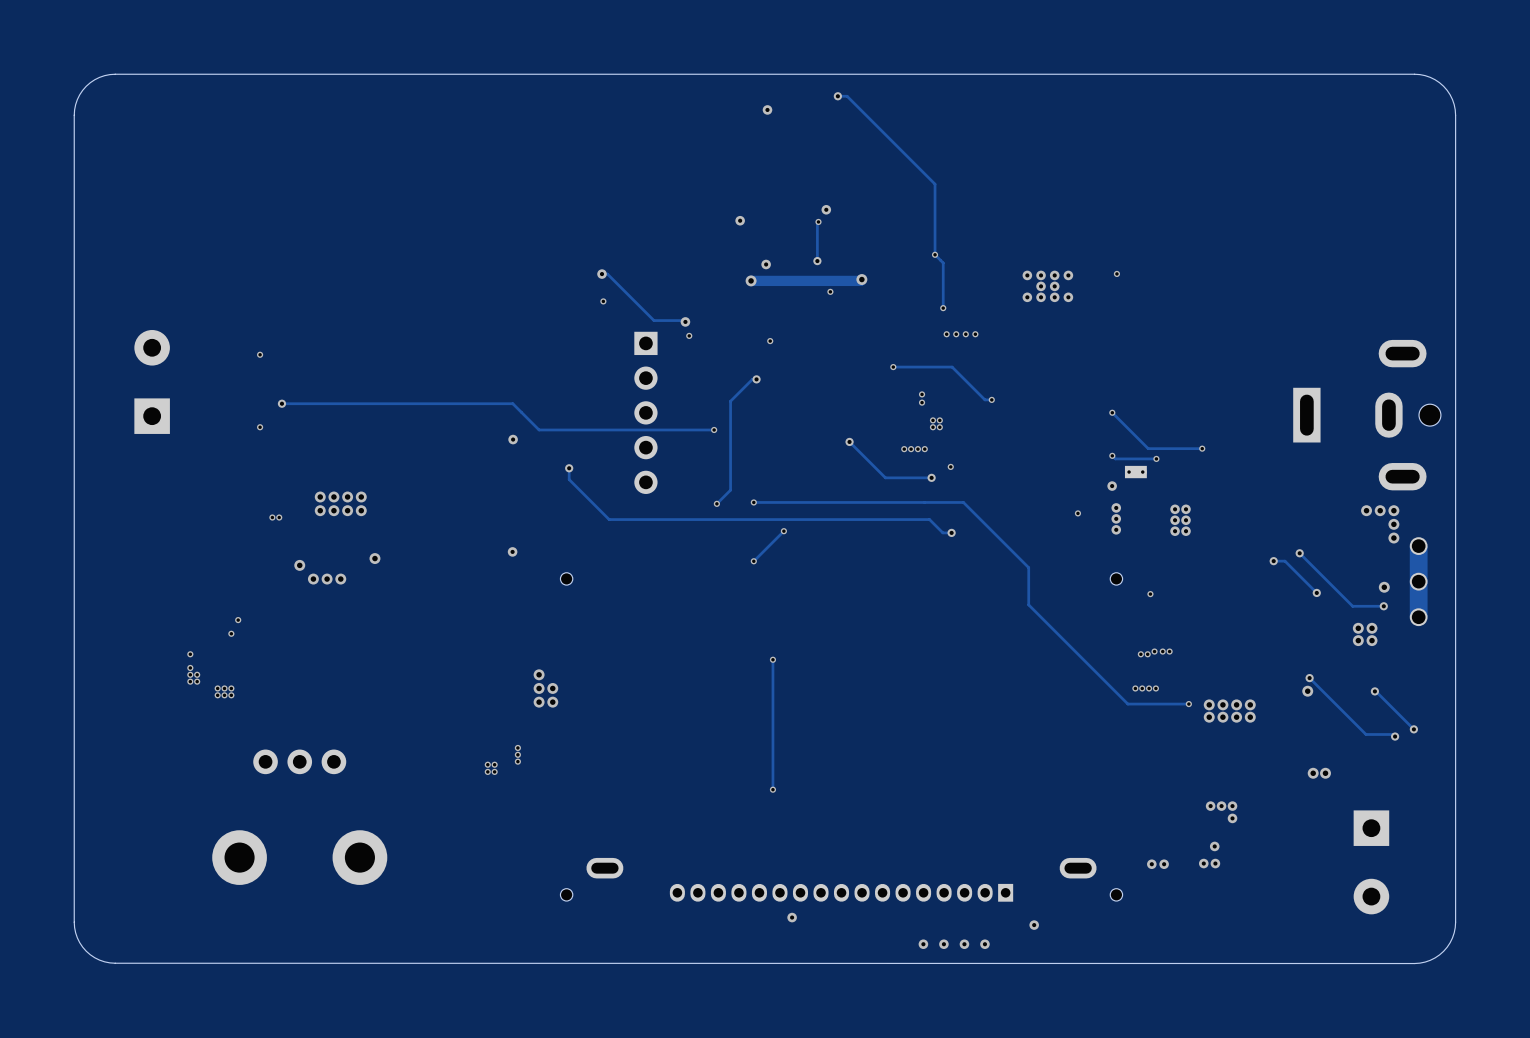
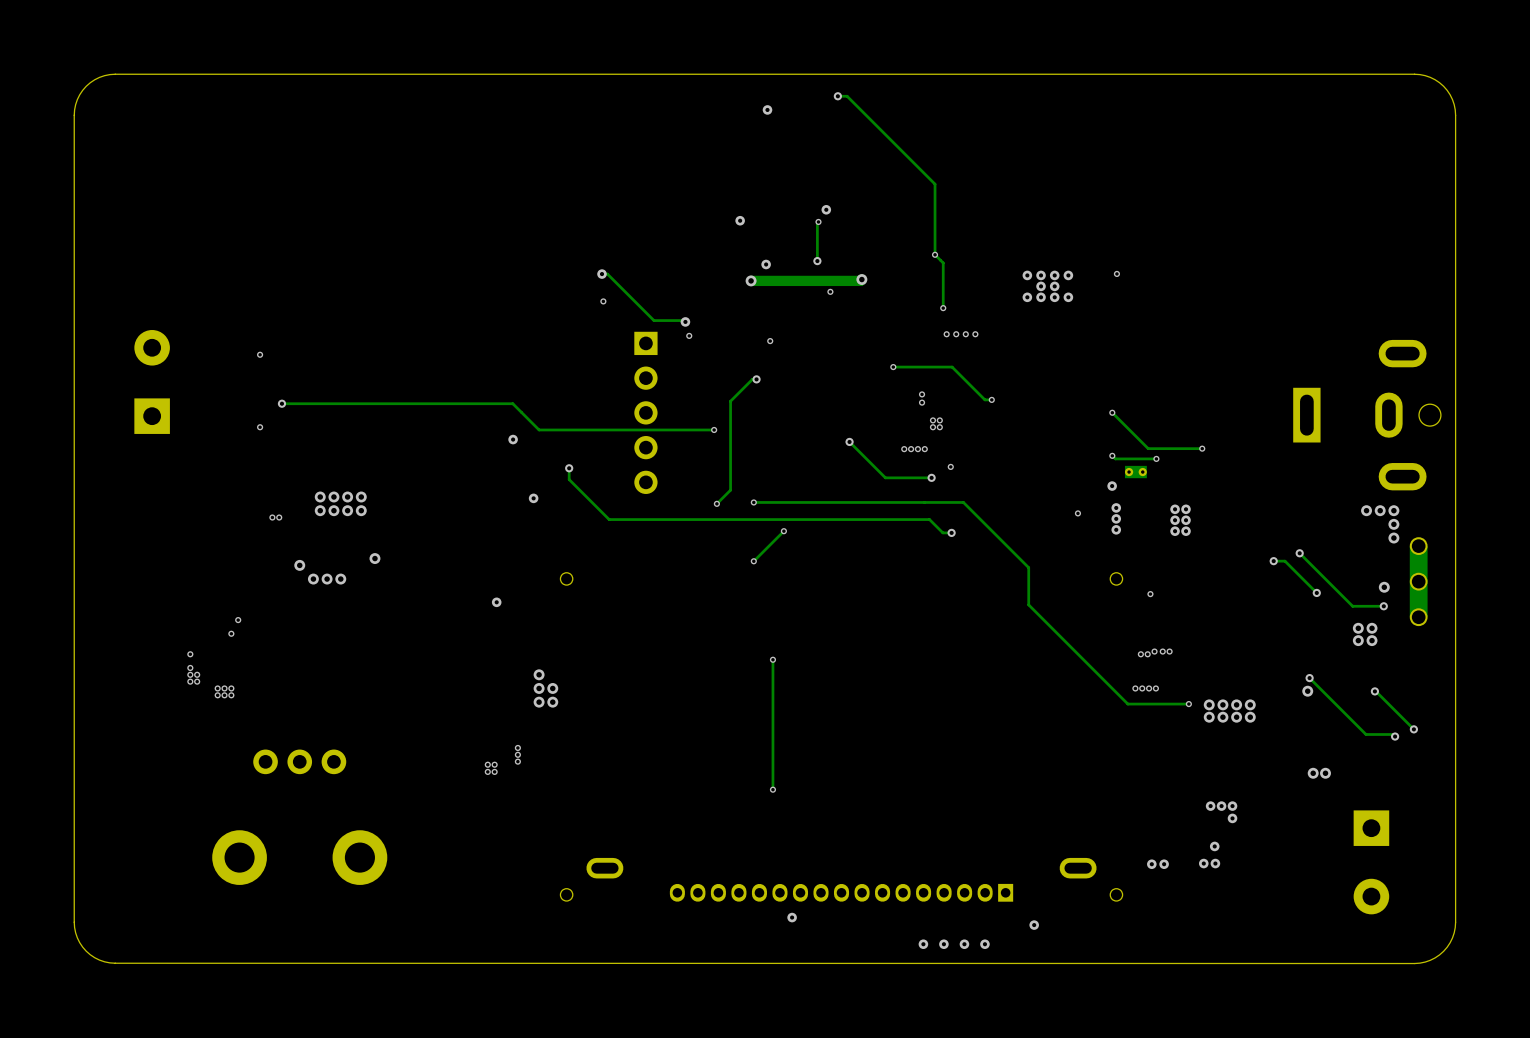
via: none -> (533, 498)
via: (512, 551) -> none
via: none -> (496, 602)

